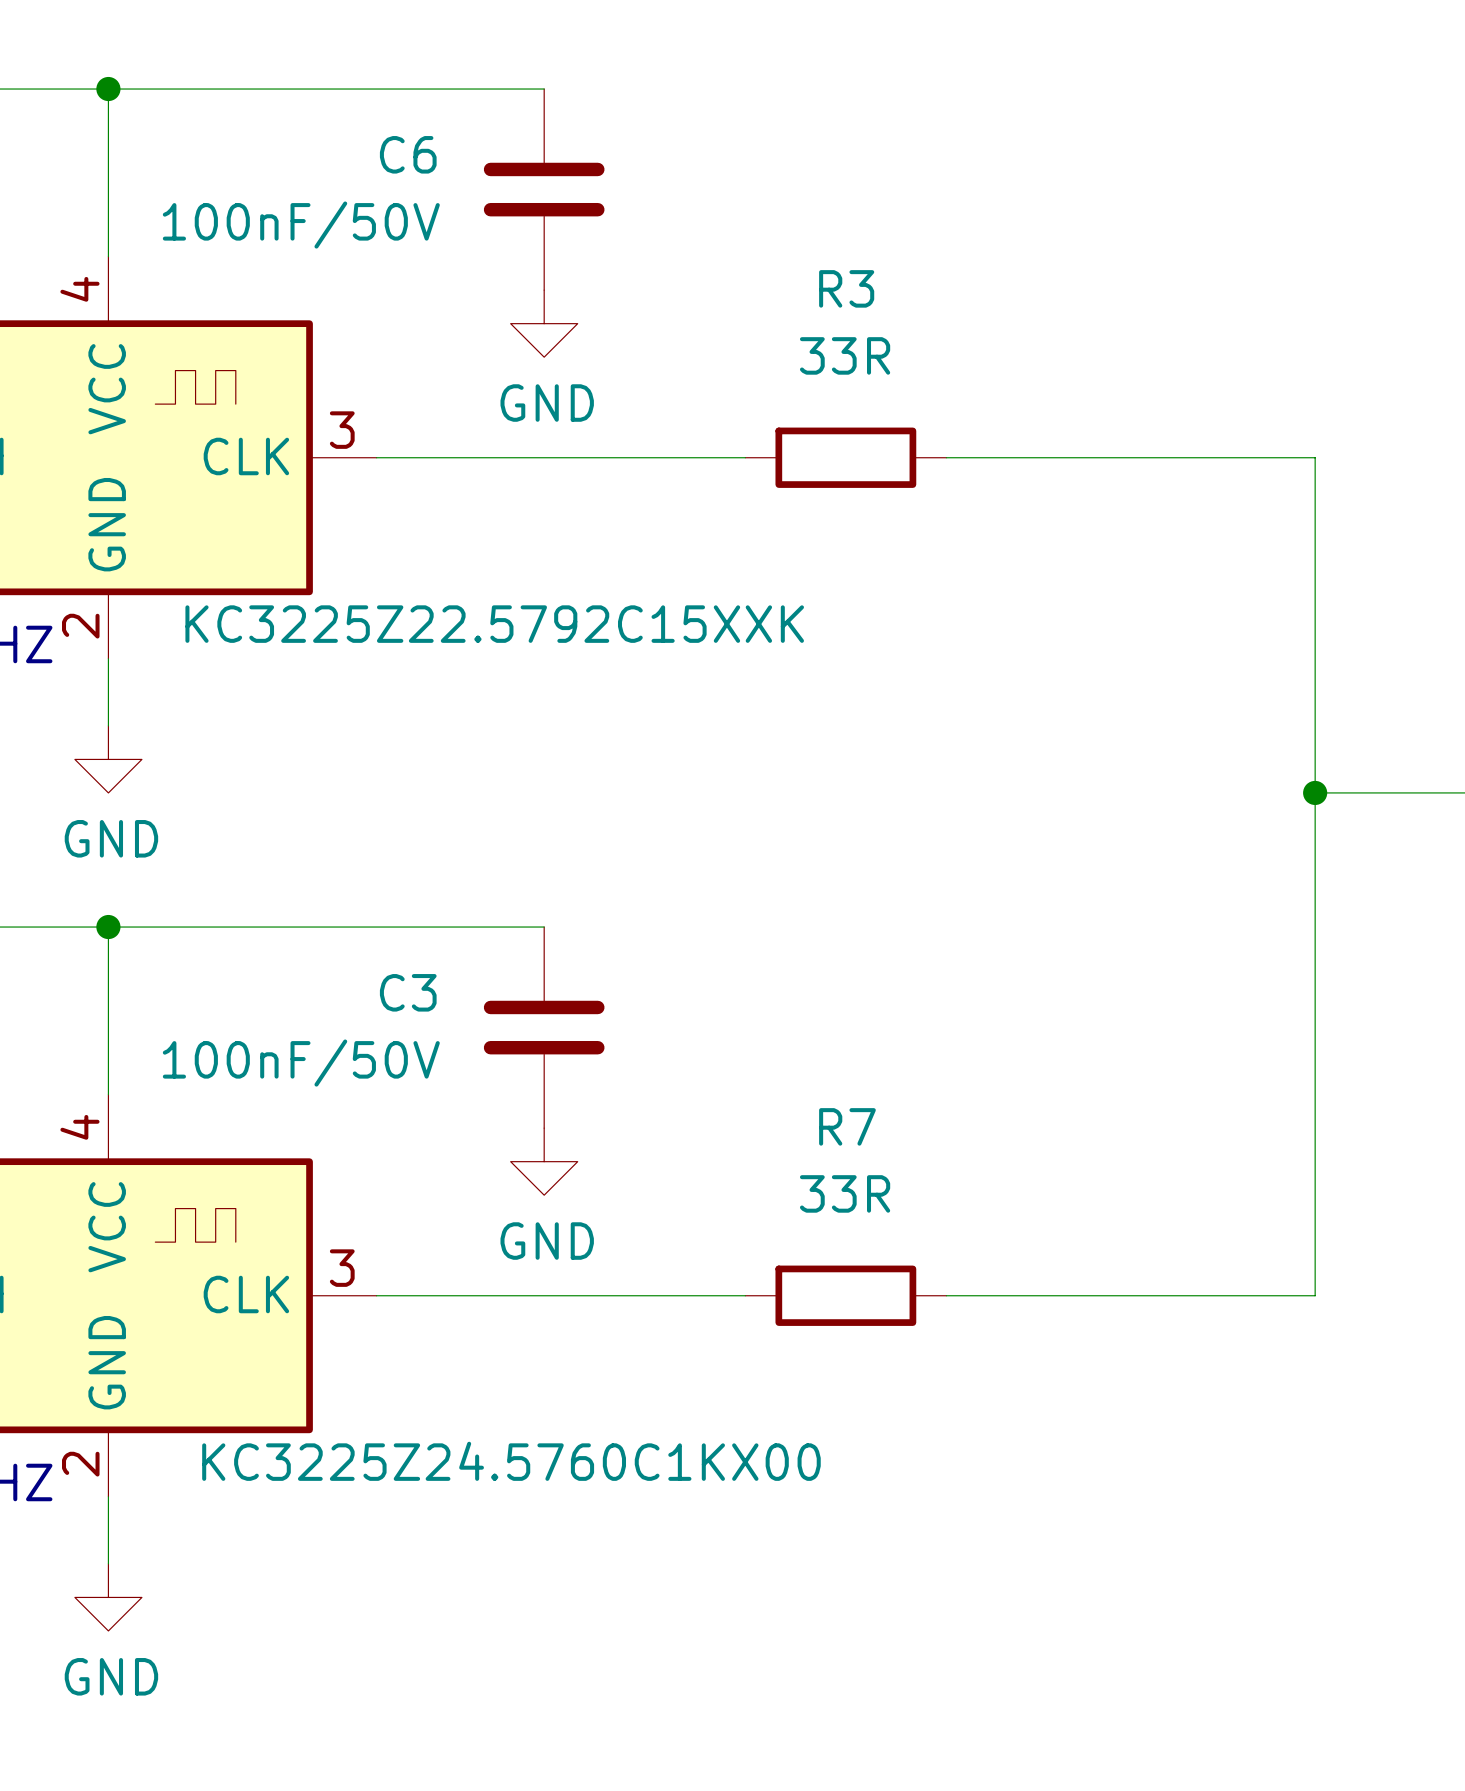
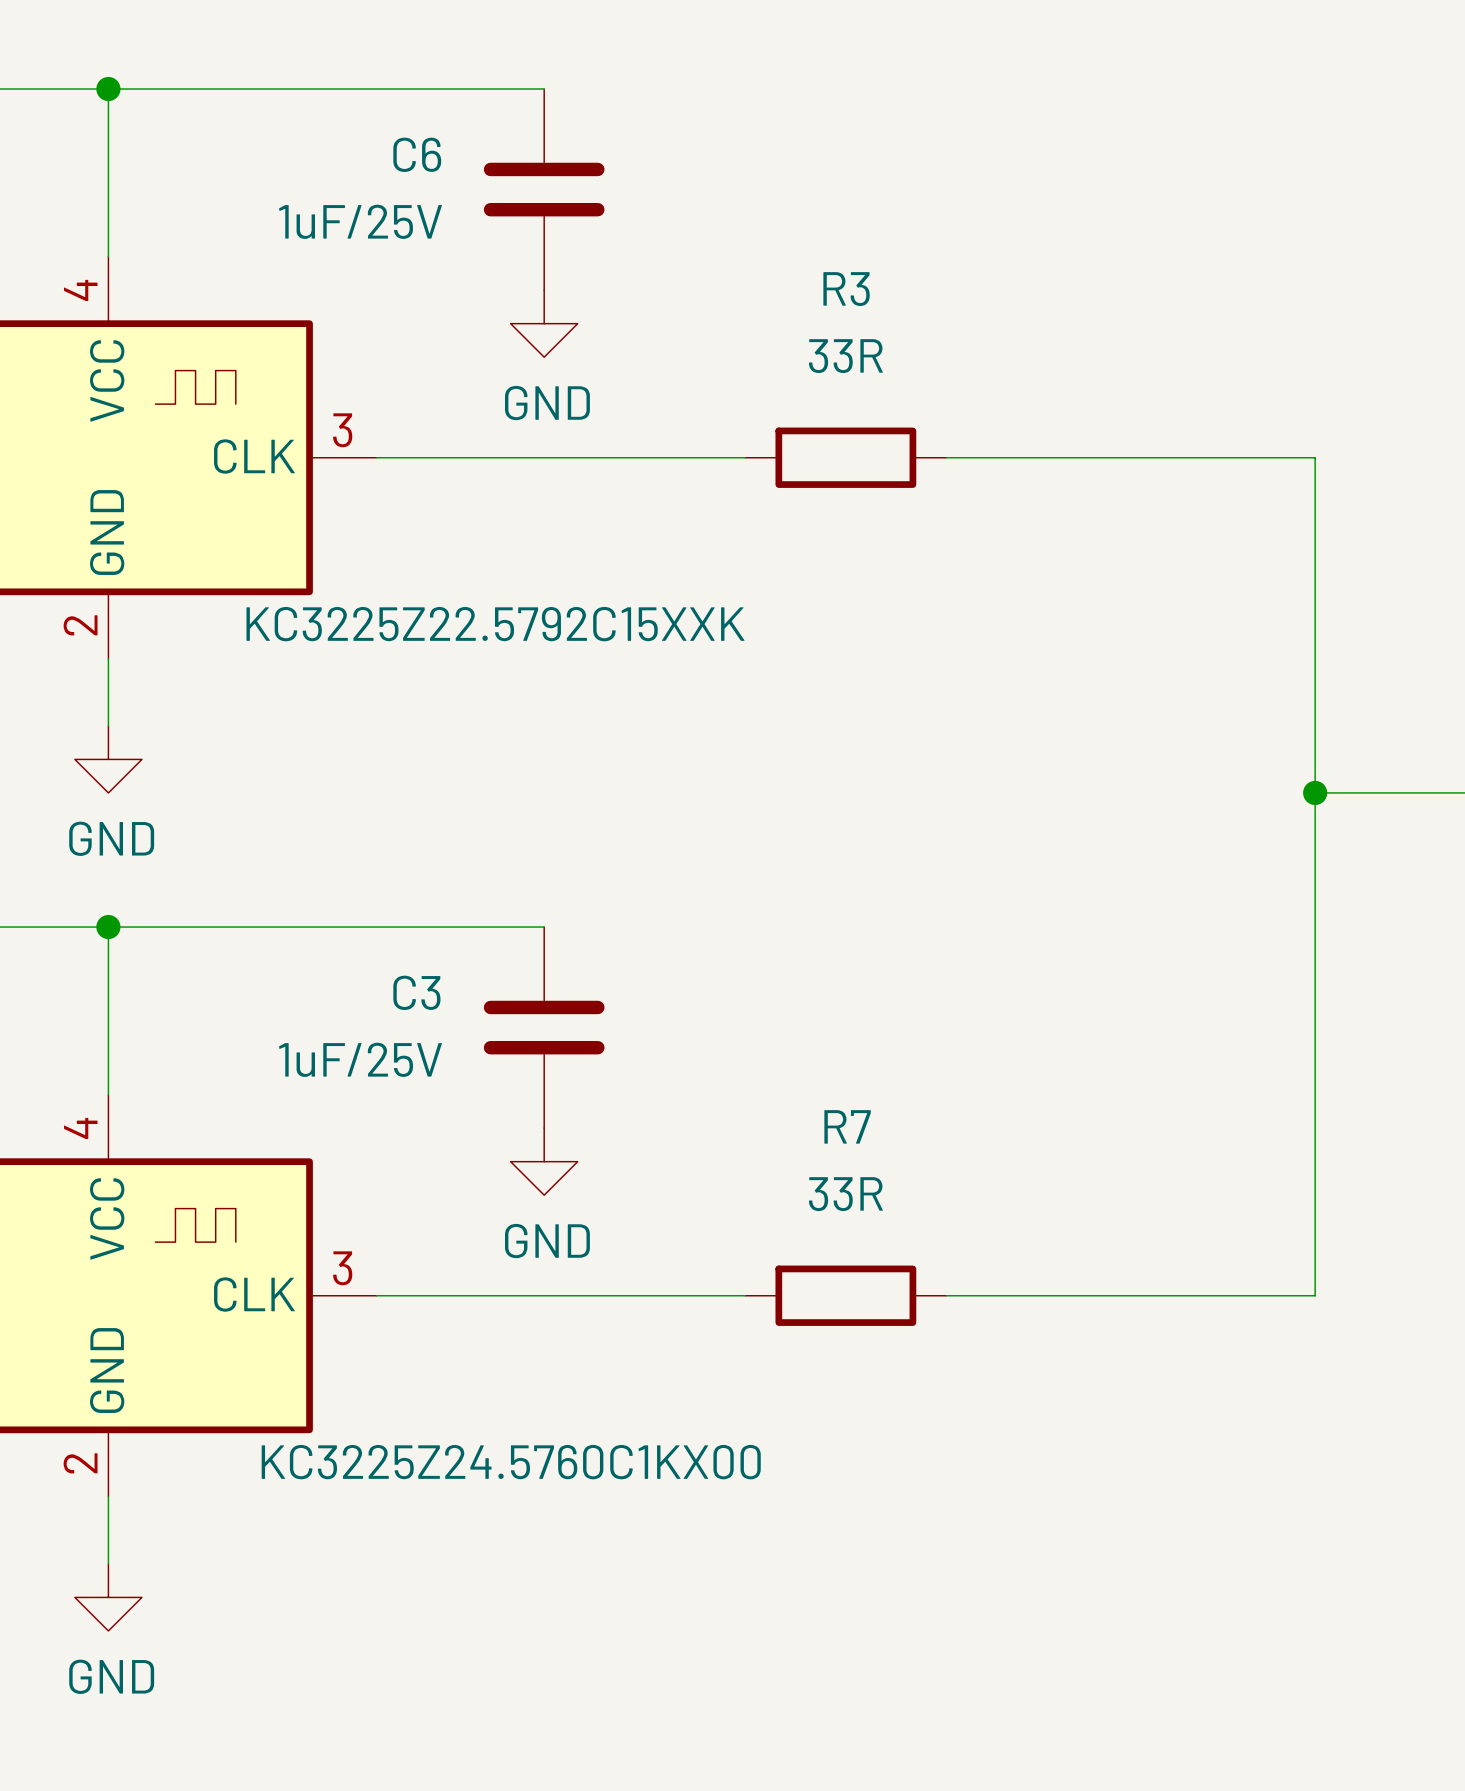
C6 value: 100nF/50V (301, 225) -> 1uF/25V (360, 221)
C3 value: 100nF/50V (301, 1063) -> 1uF/25V (360, 1059)

